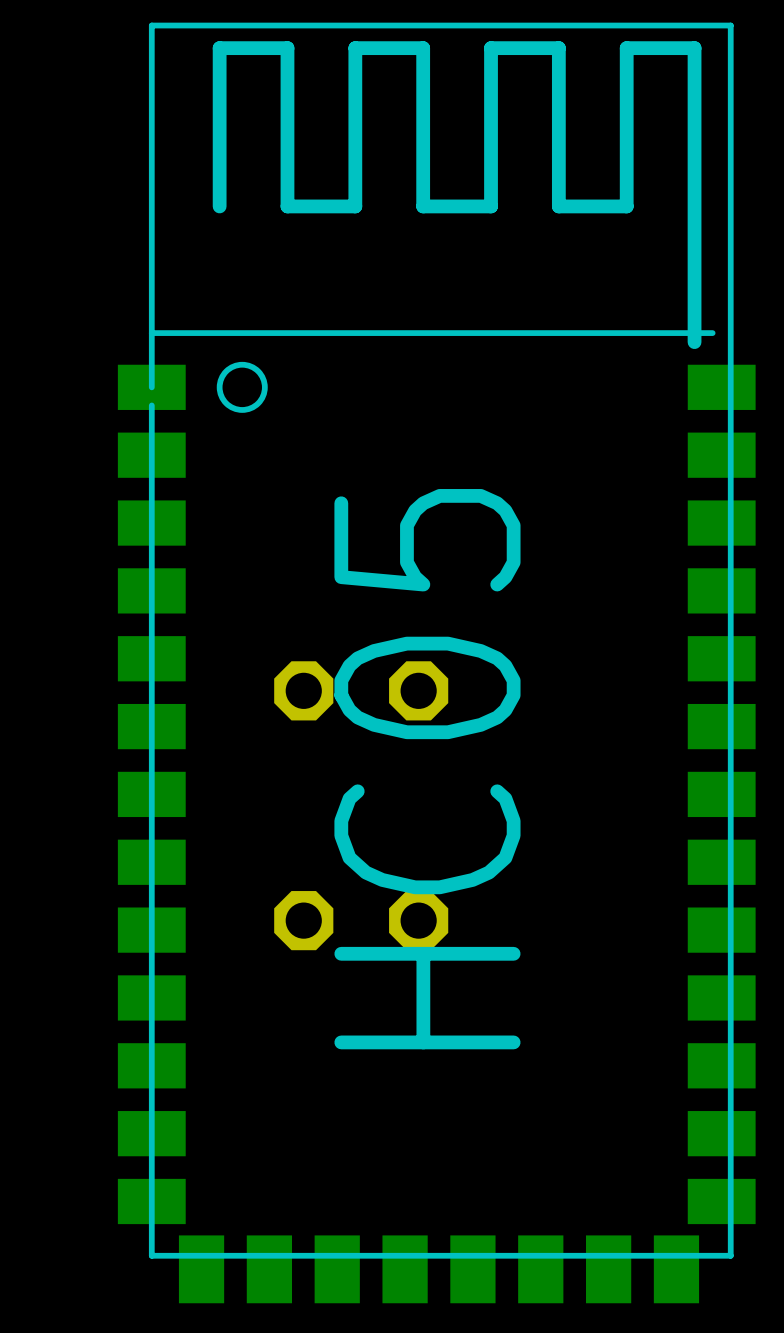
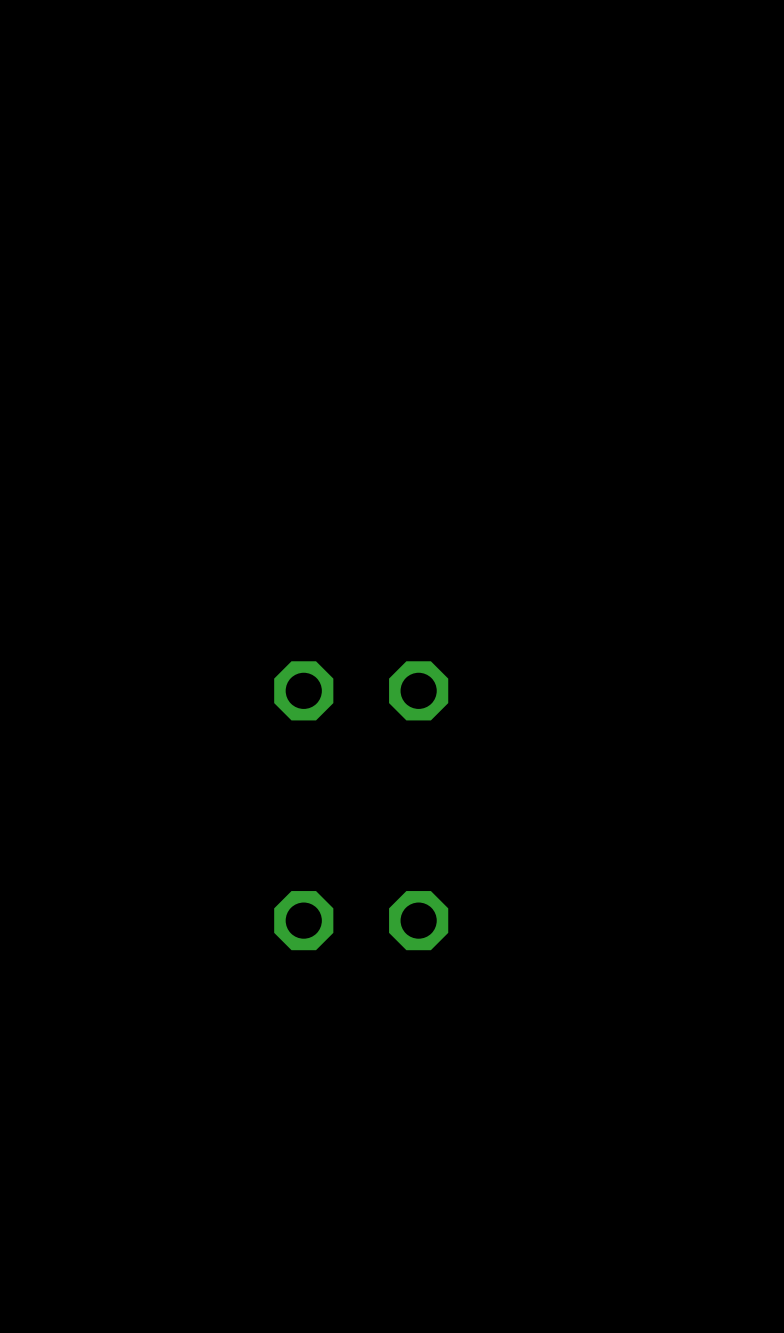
part: (436, 662) -> none

